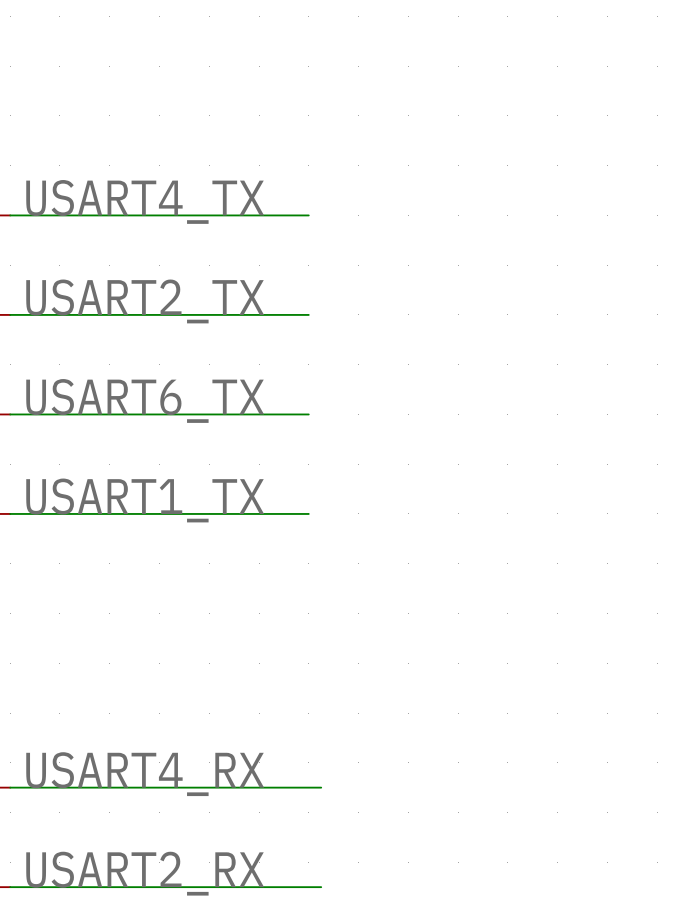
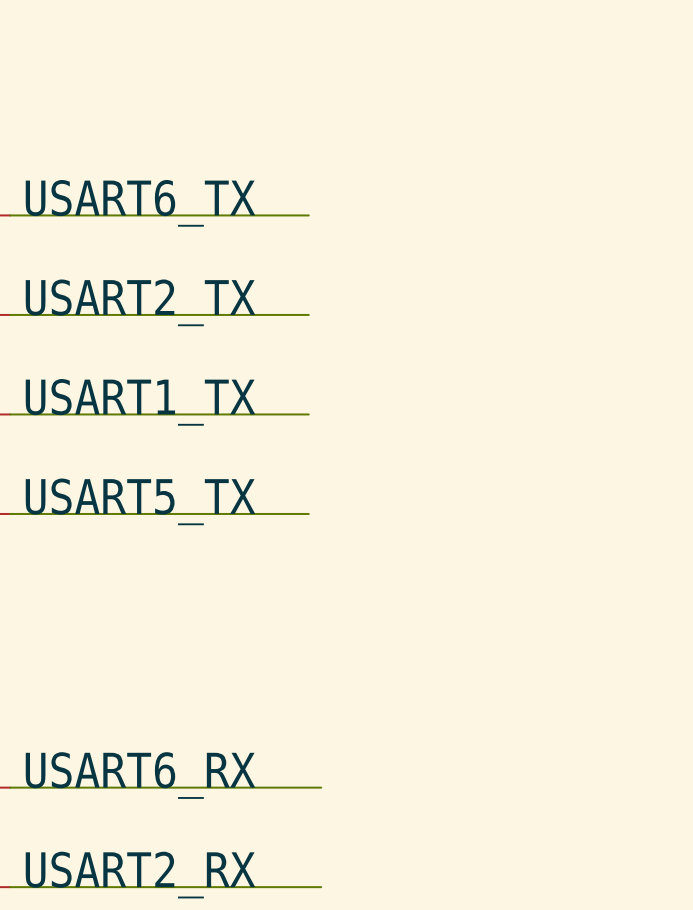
label: USART4_TX (145, 201) -> USART6_TX (140, 203)
label: USART6_TX (145, 400) -> USART1_TX (140, 402)
label: USART1_TX (145, 500) -> USART5_TX (140, 501)
label: USART4_RX (145, 774) -> USART6_RX (140, 775)

